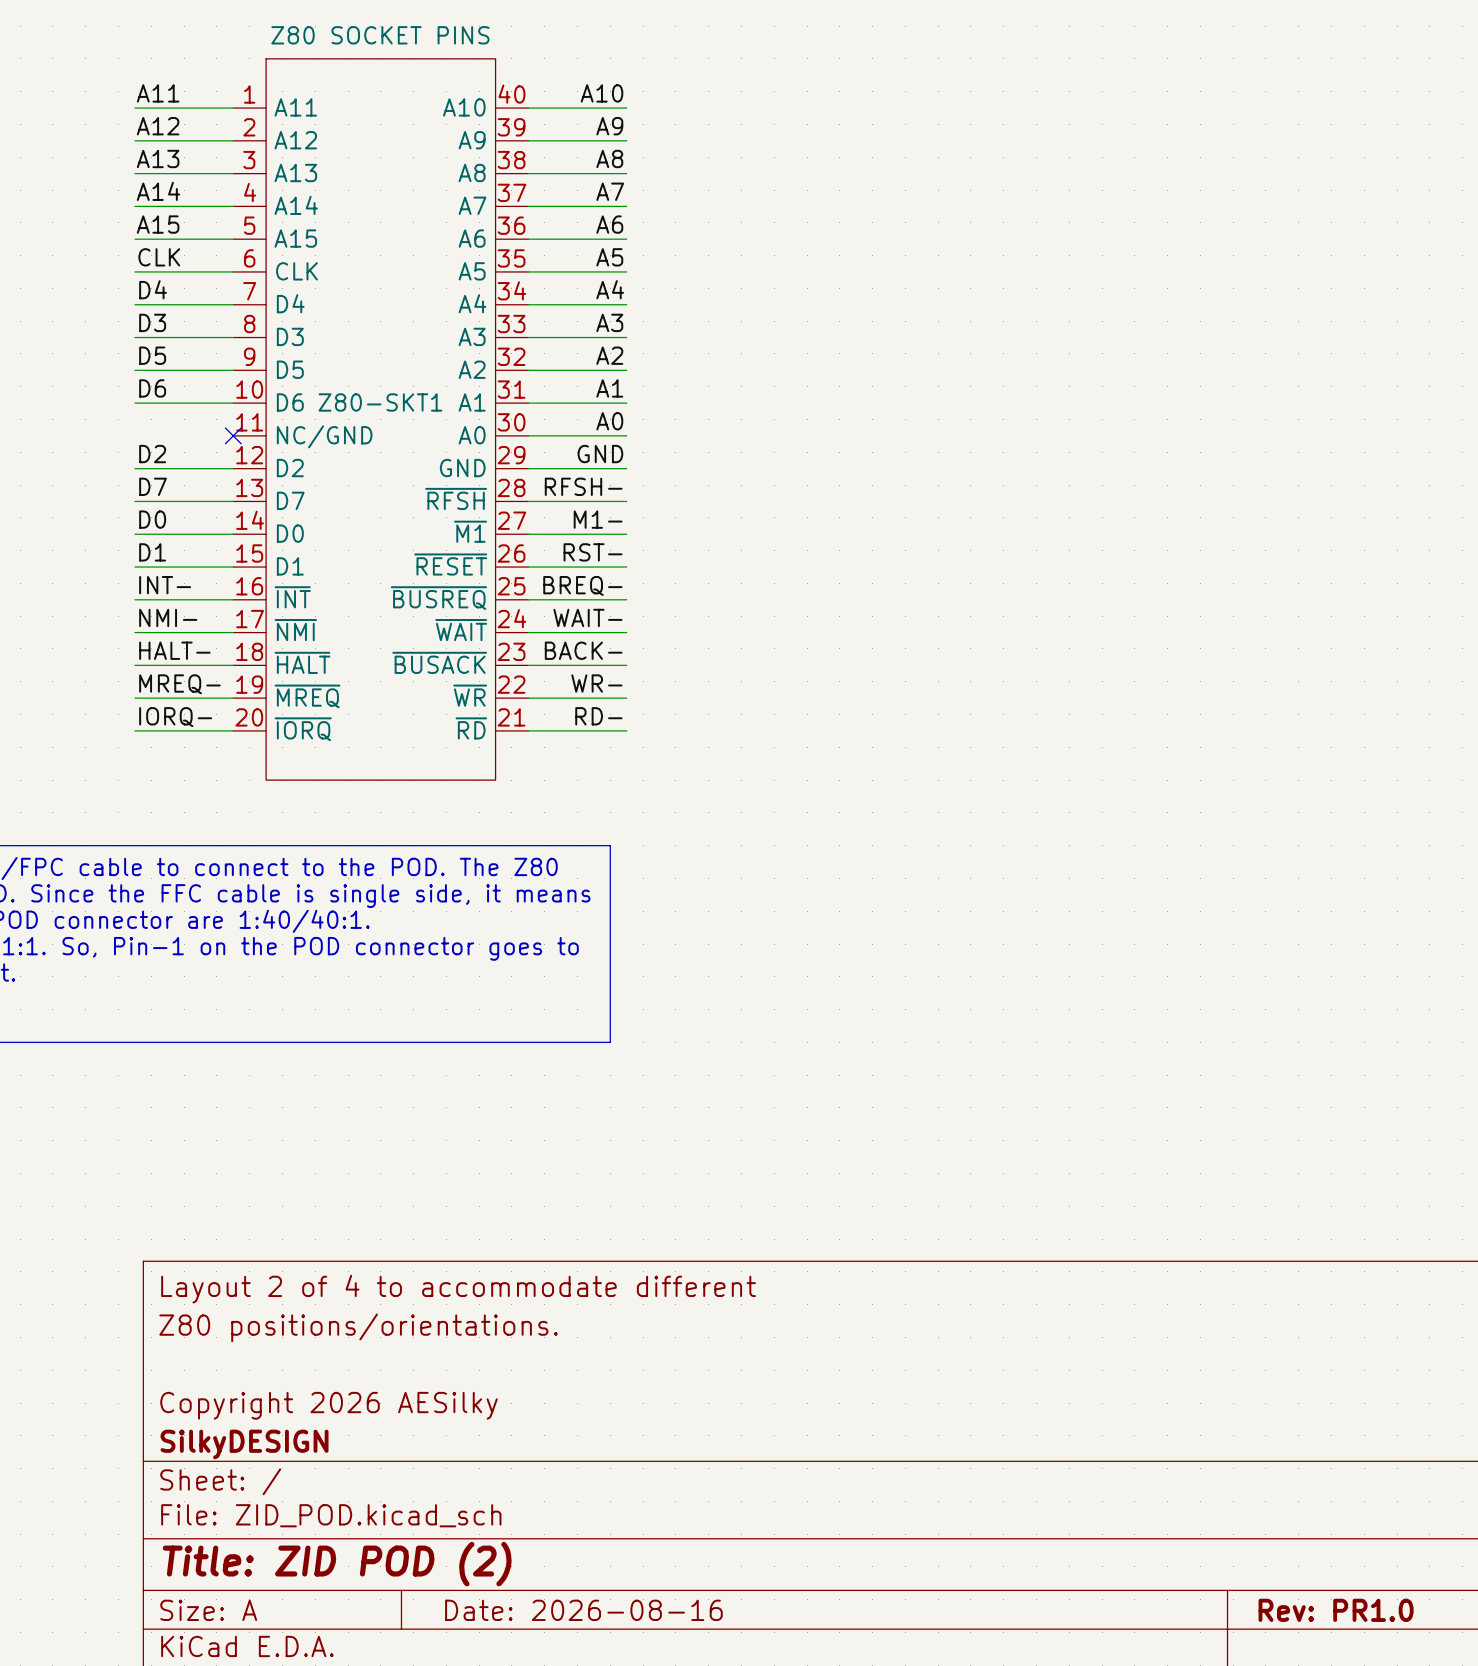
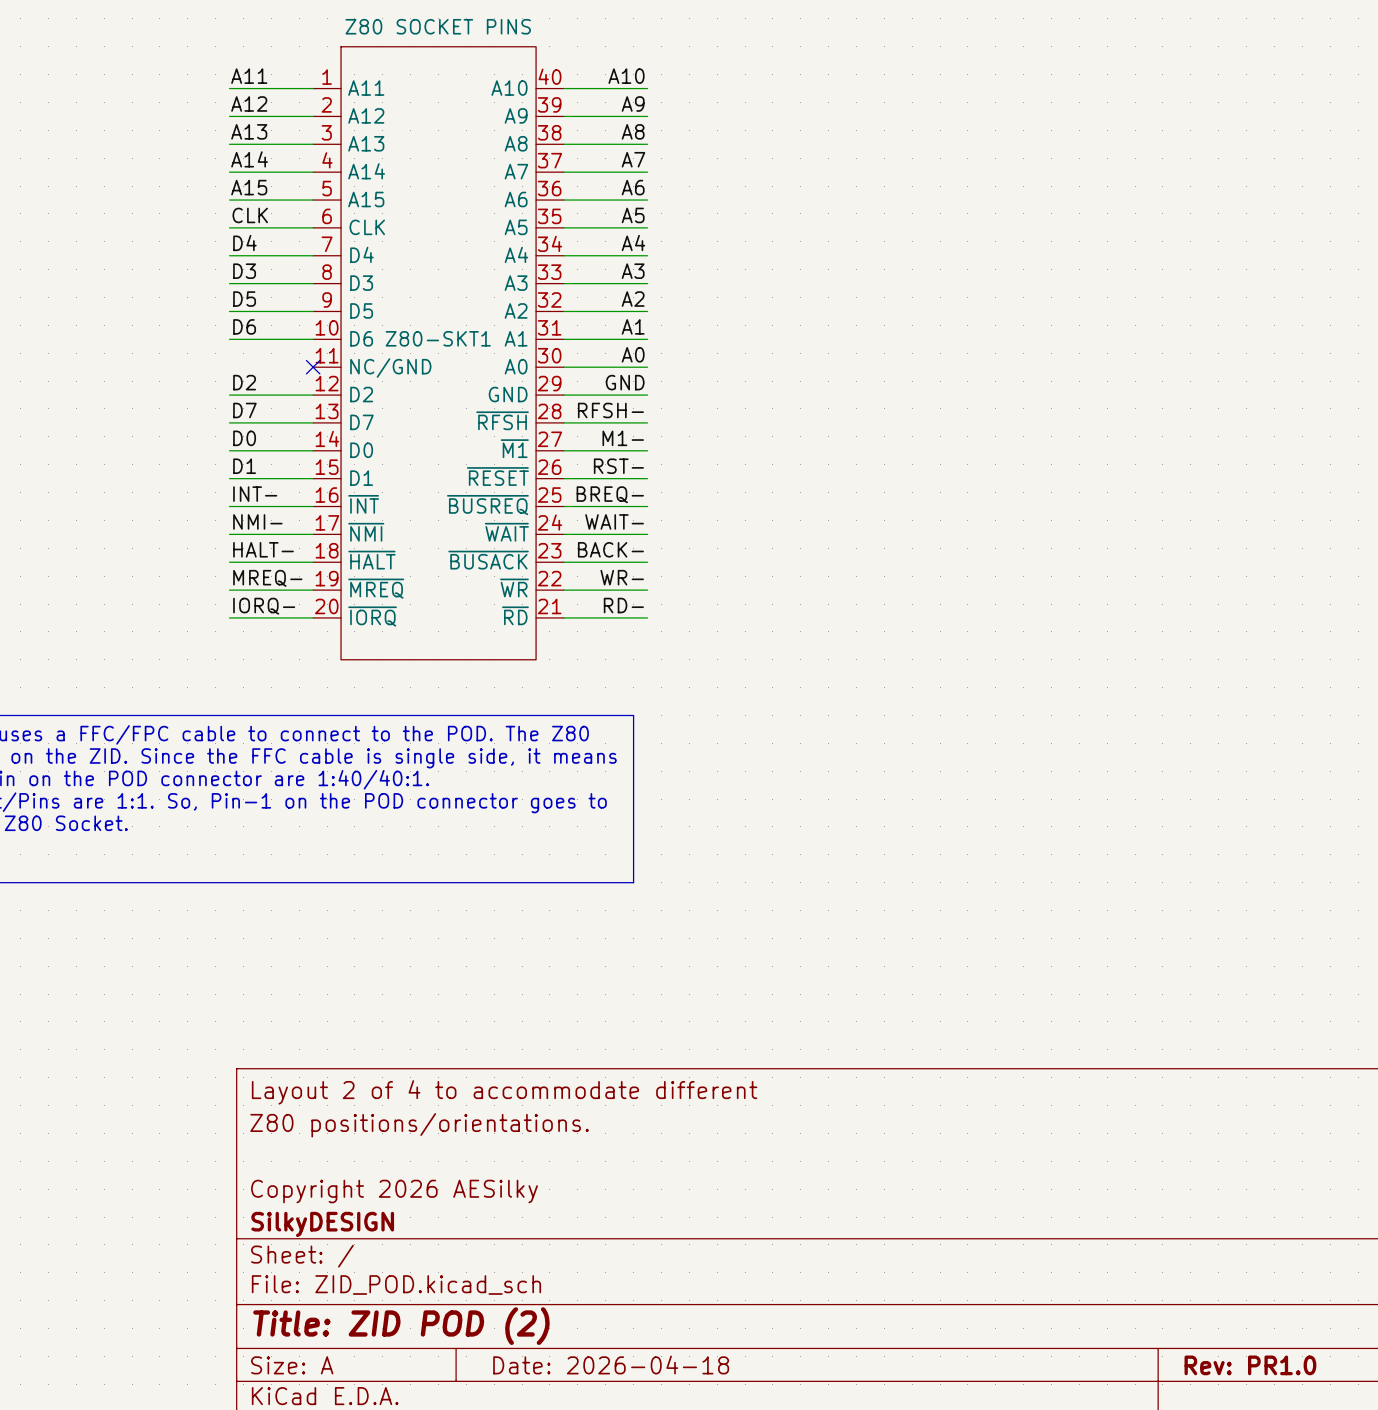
title block: Date: 2026-08-16 (583, 1610) -> Date: 2026-04-18 (611, 1364)

